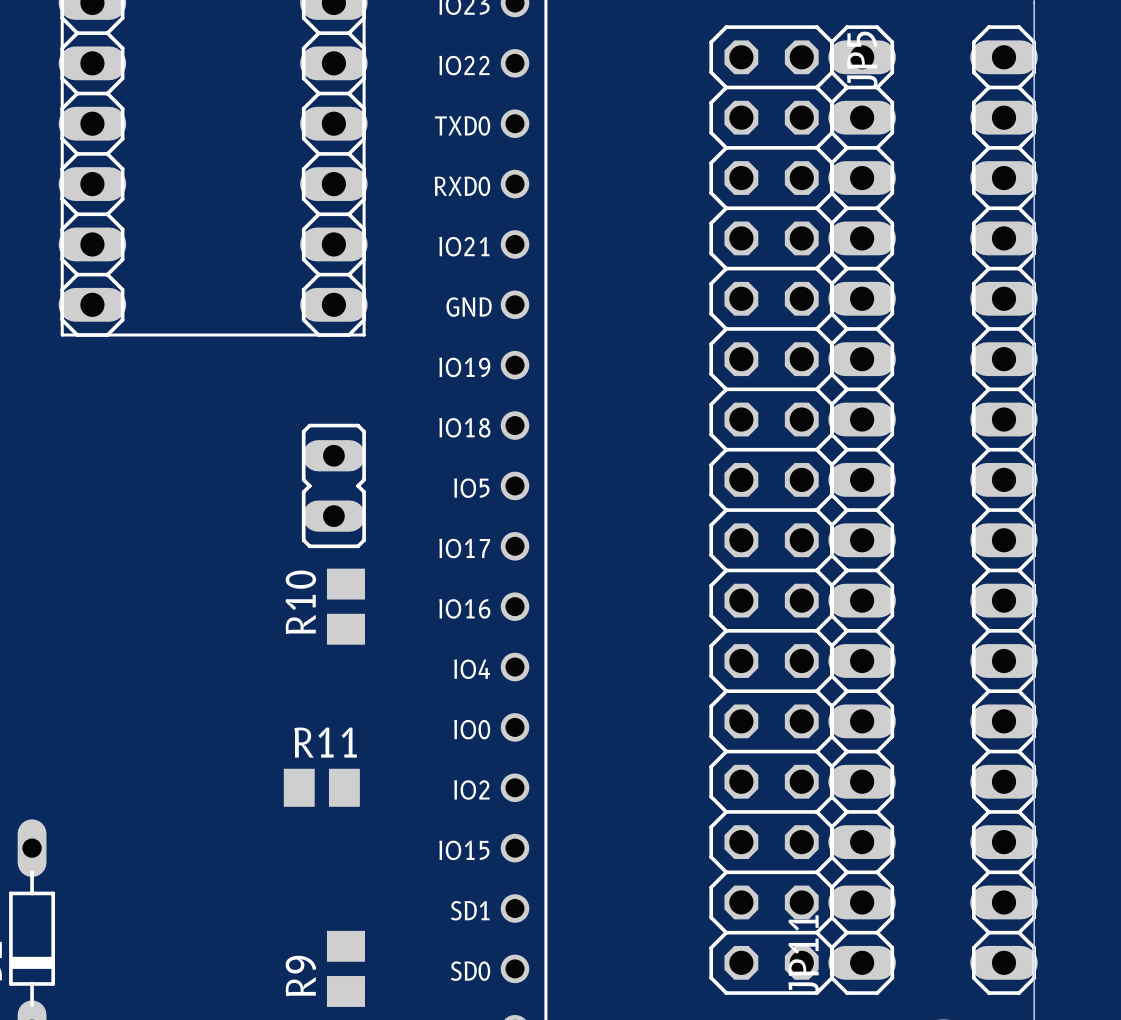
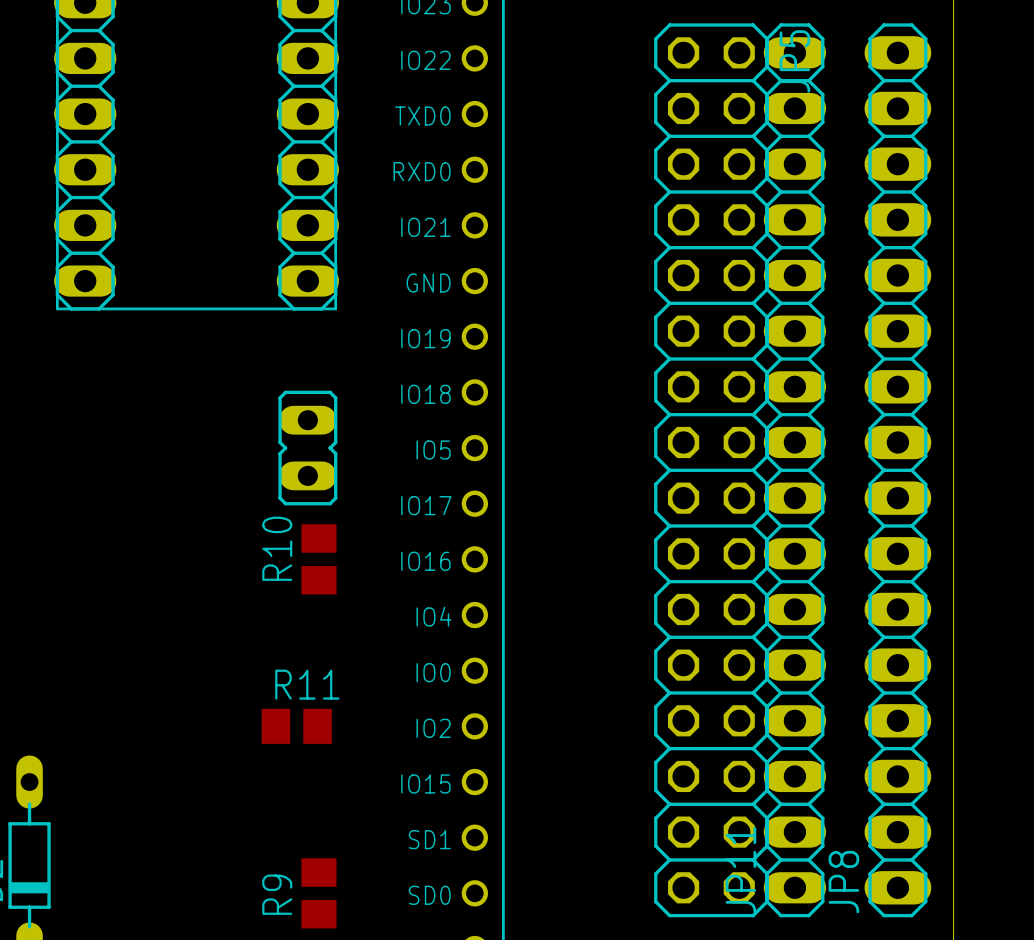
JP8: none -> (897, 470)
part: (1004, 510) -> none

